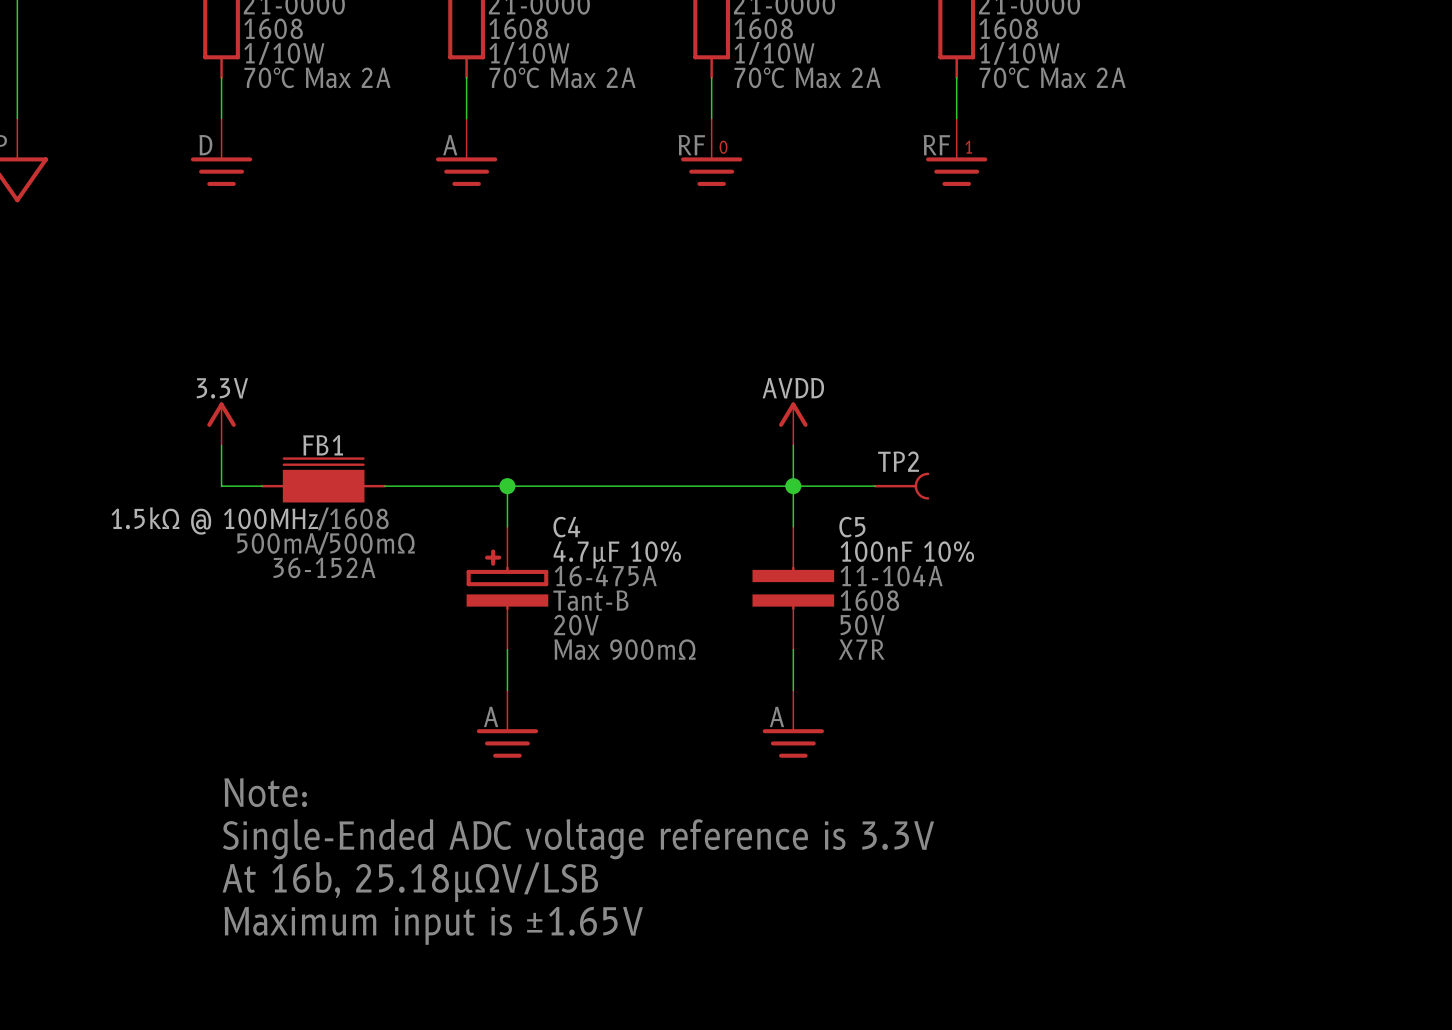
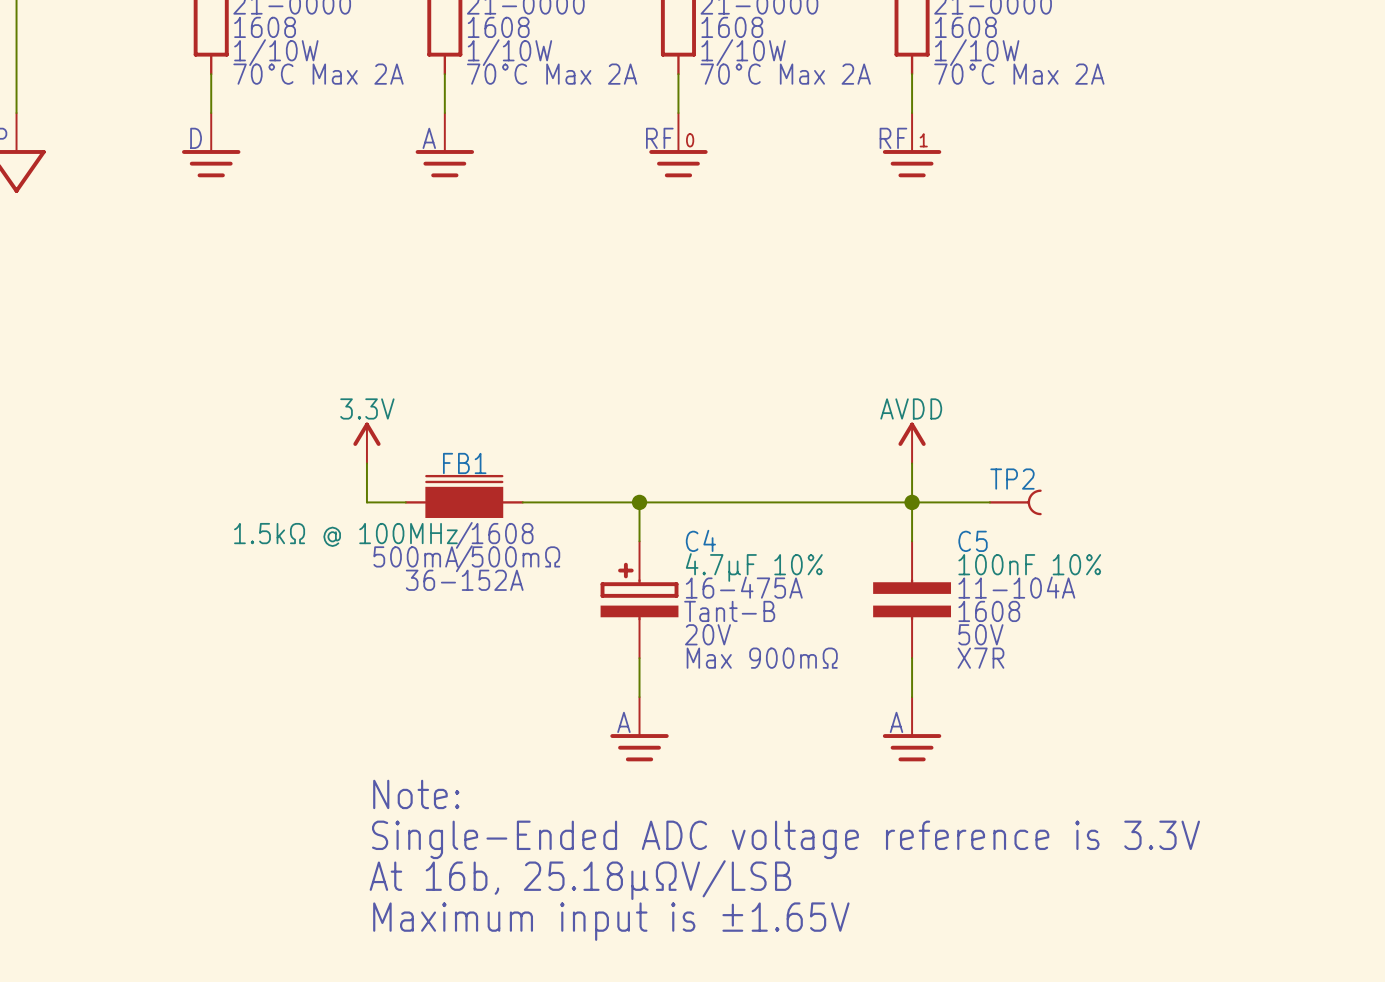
power symbol position: 3.3V (221, 423) -> 3.3V (366, 443)
power symbol position: AVDD (793, 423) -> AVDD (912, 443)
wire: (221, 445) (221, 486) (262, 486) -> none
wire: (793, 445) (793, 526) -> (912, 463) (912, 541)
FB1 position: (323, 479) -> (464, 496)
wire: (384, 486) (875, 486) -> (366, 463) (366, 502) (405, 502)
junction: (507, 486) -> none
junction: (793, 486) -> none
TP2 position: (901, 486) -> (1015, 502)
wire: none -> (522, 502) (989, 502)
junction: none -> (639, 502)
junction: none -> (912, 502)
C4 position: (507, 588) -> (639, 599)
C5 position: (793, 588) -> (912, 599)
wire: (507, 649) (507, 690) -> (639, 658) (639, 697)
wire: (793, 649) (793, 690) -> (912, 658) (912, 697)
power symbol: (507, 724) -> none
power symbol: (793, 724) -> none
power symbol: none -> (639, 729)
power symbol: none -> (912, 729)
text position: Note: (265, 792) -> Note: (416, 794)
text position: Single-Ended ADC voltage reference is 3.3V (578, 839) -> Single-Ended ADC voltage reference is 3.3V (785, 839)
text position: At 16b, 25.18µΩV/LSB (410, 881) -> At 16b, 25.18µΩV/LSB (580, 880)
text position: Maximum input is ±1.65V (433, 925) -> Maximum input is ±1.65V (611, 921)

